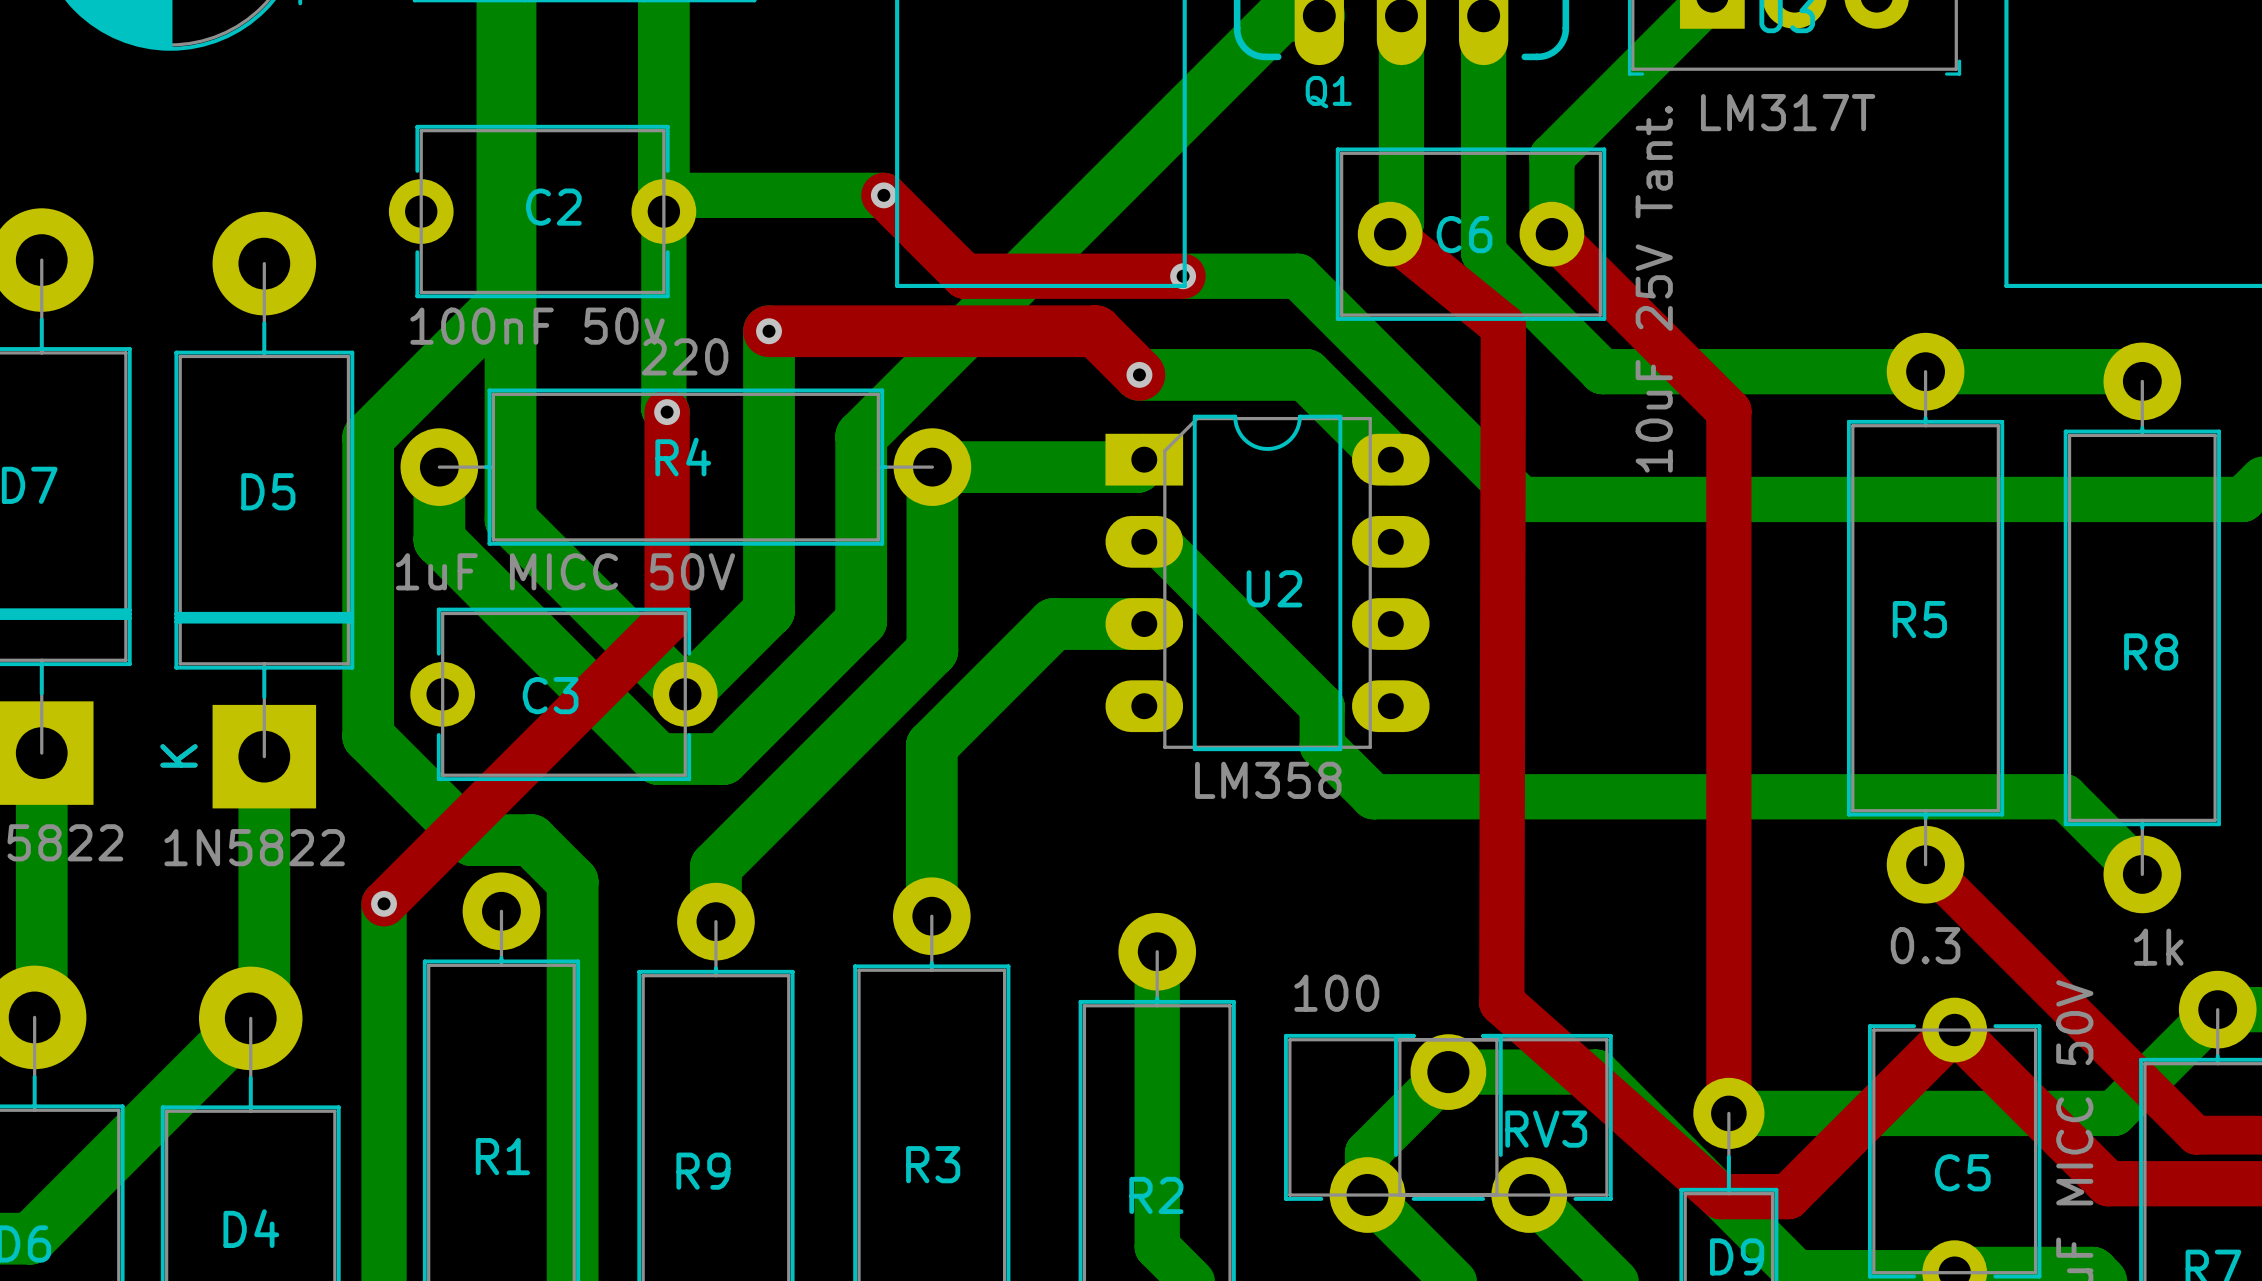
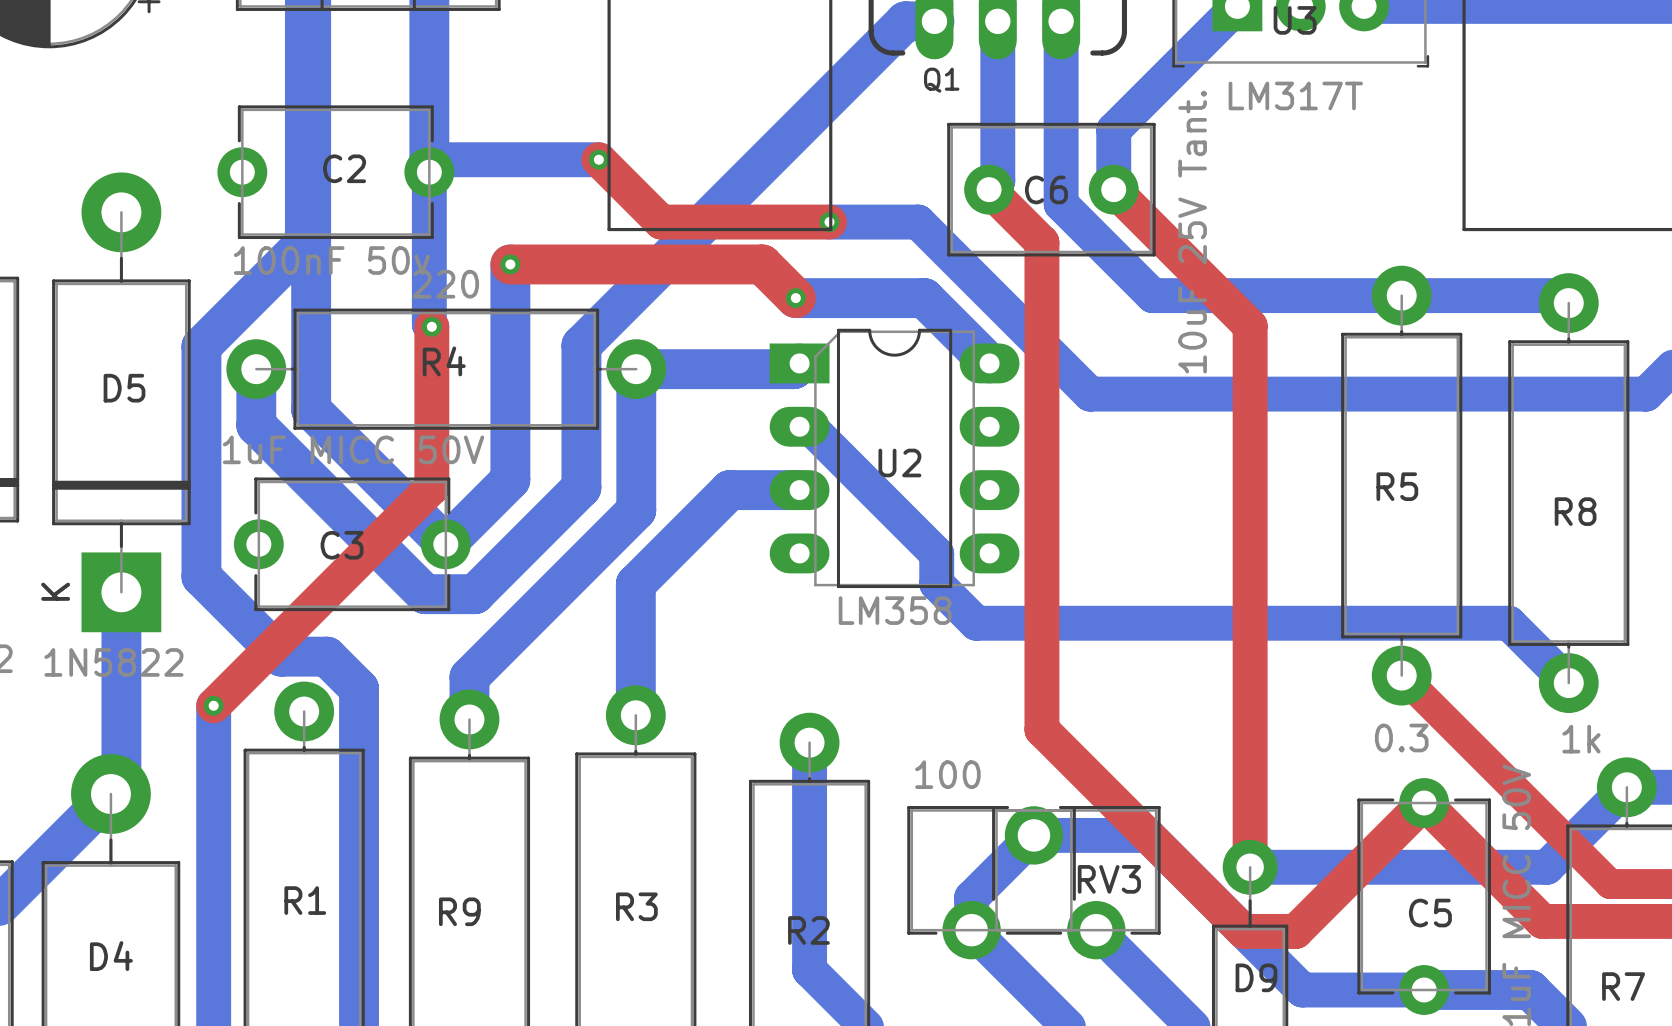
top track: (1390, 234) (1503, 326) (1501, 1002) (1720, 1196) -> (989, 189) (1041, 242) (1041, 729) (1243, 931)

